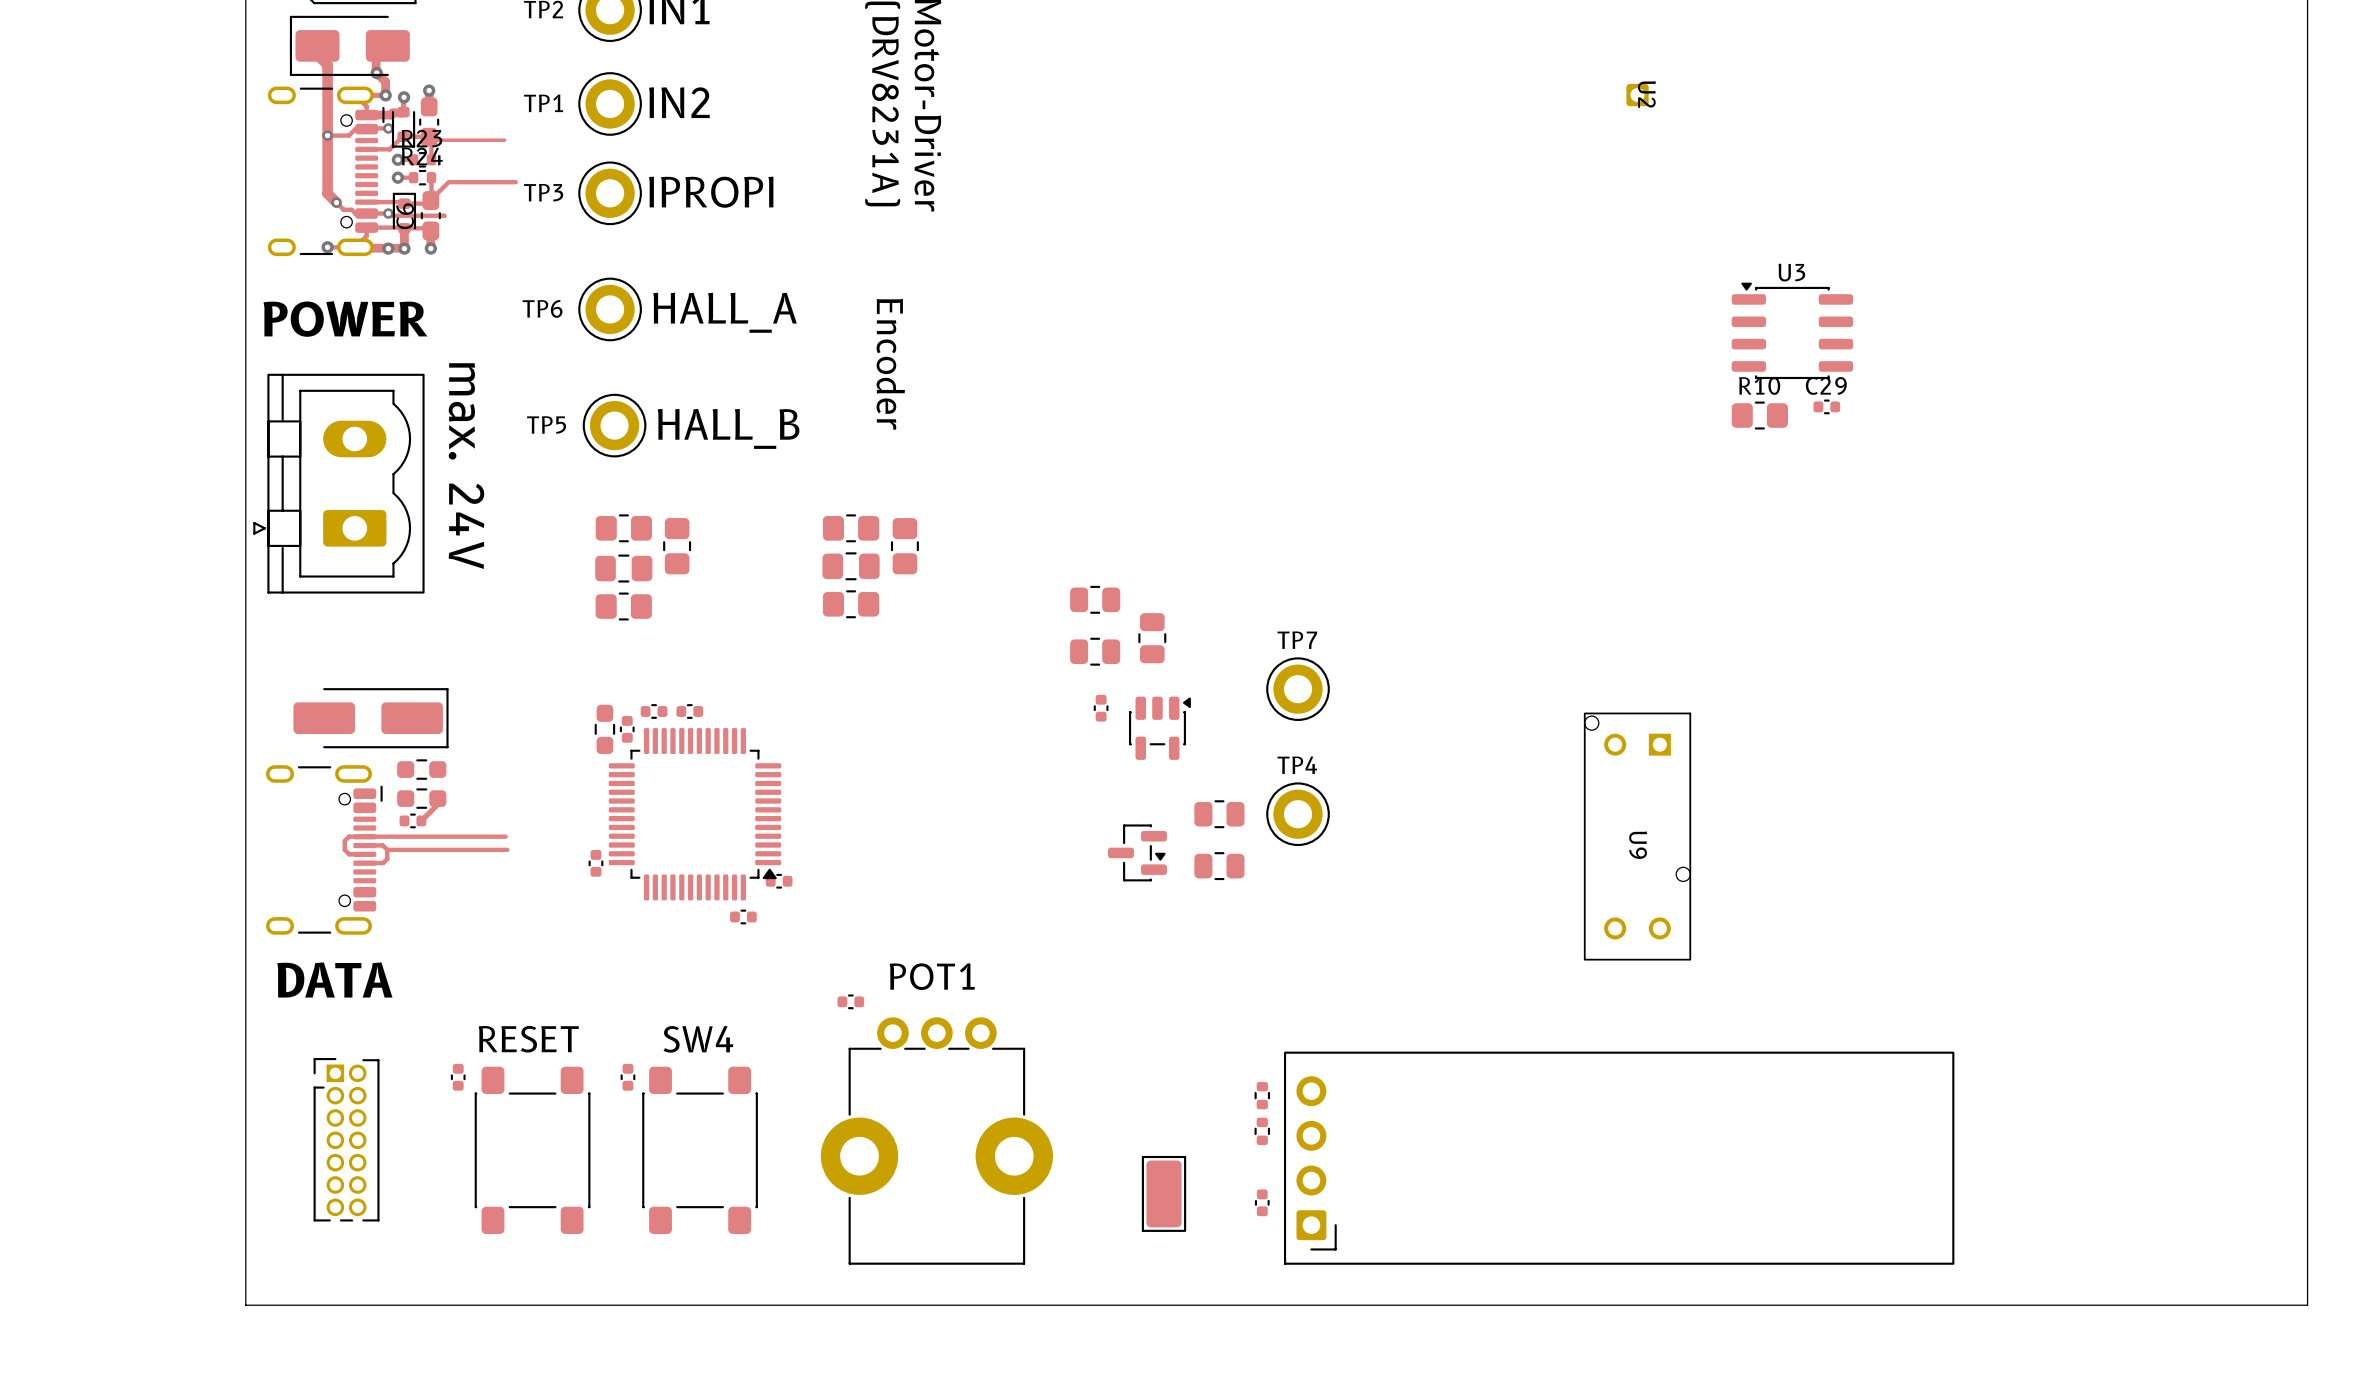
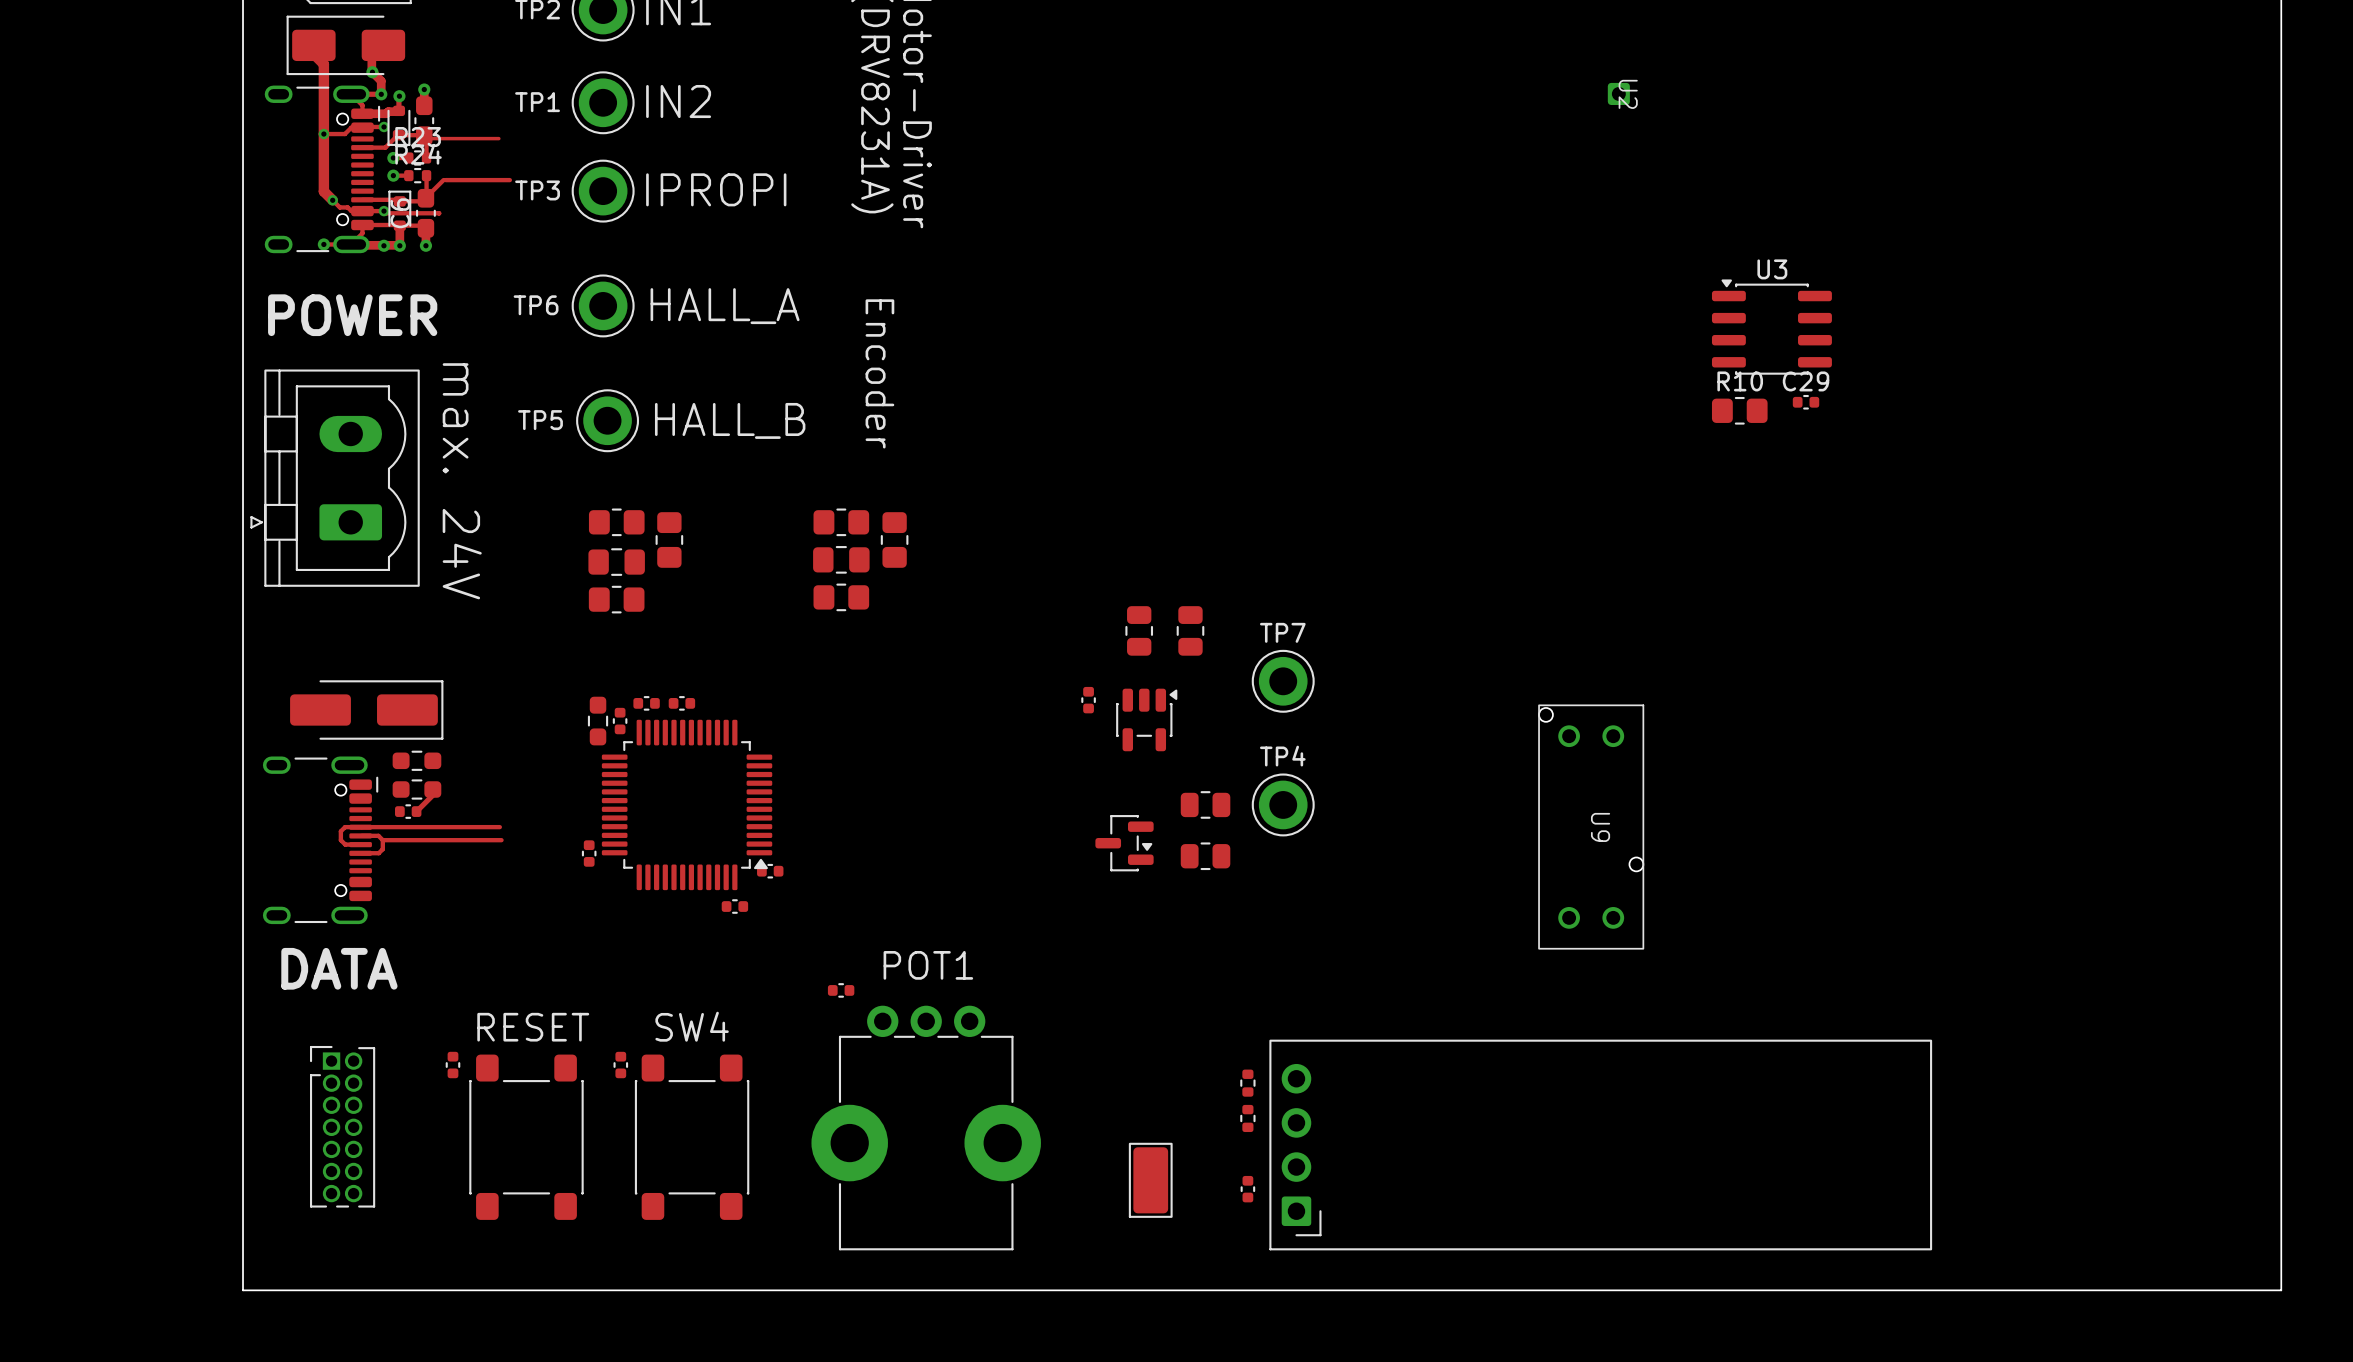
part: (1095, 599) -> none
part: none -> (1190, 630)
part: (1095, 651) -> none
U9 footprint: [1583, 712, 1692, 961] -> [1538, 704, 1645, 950]

